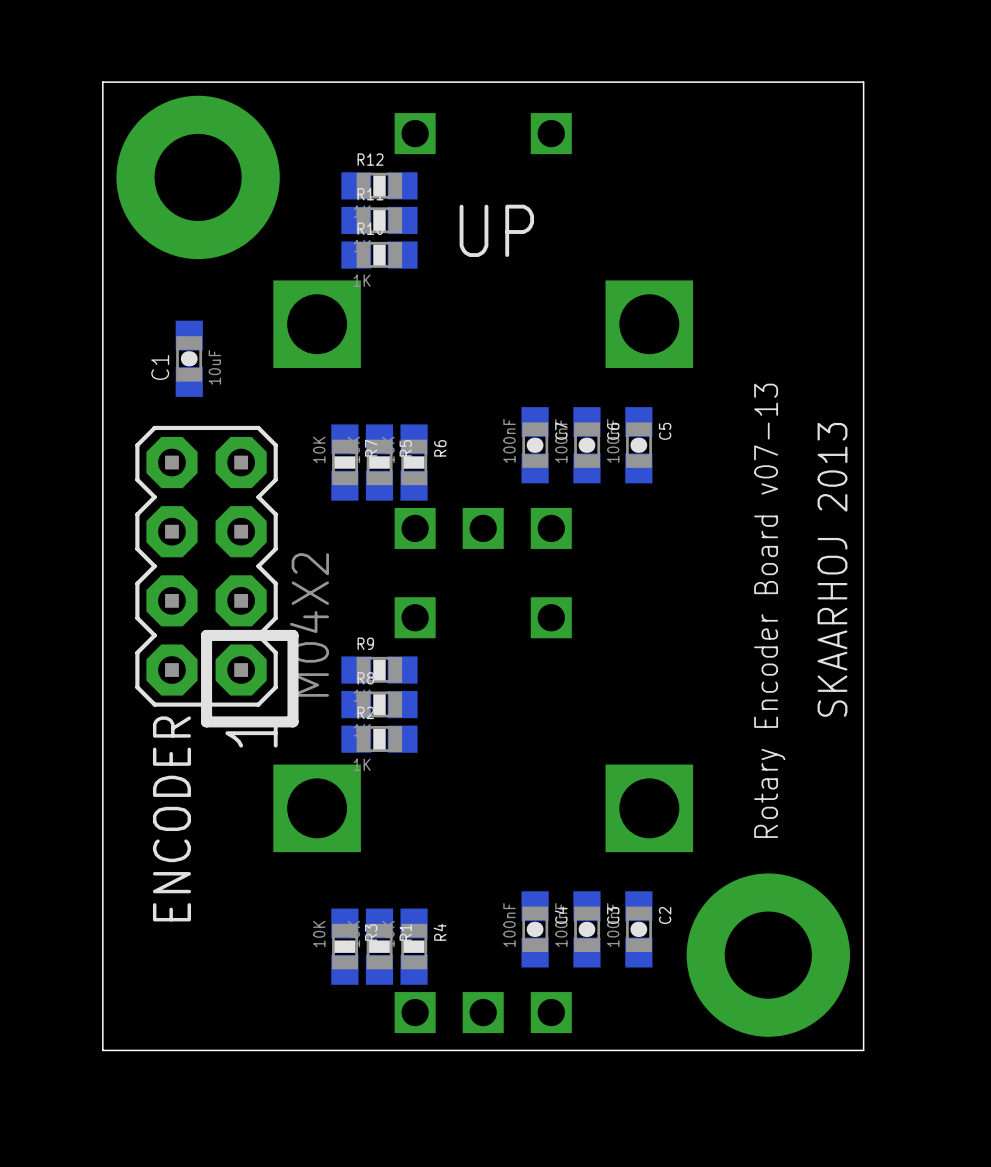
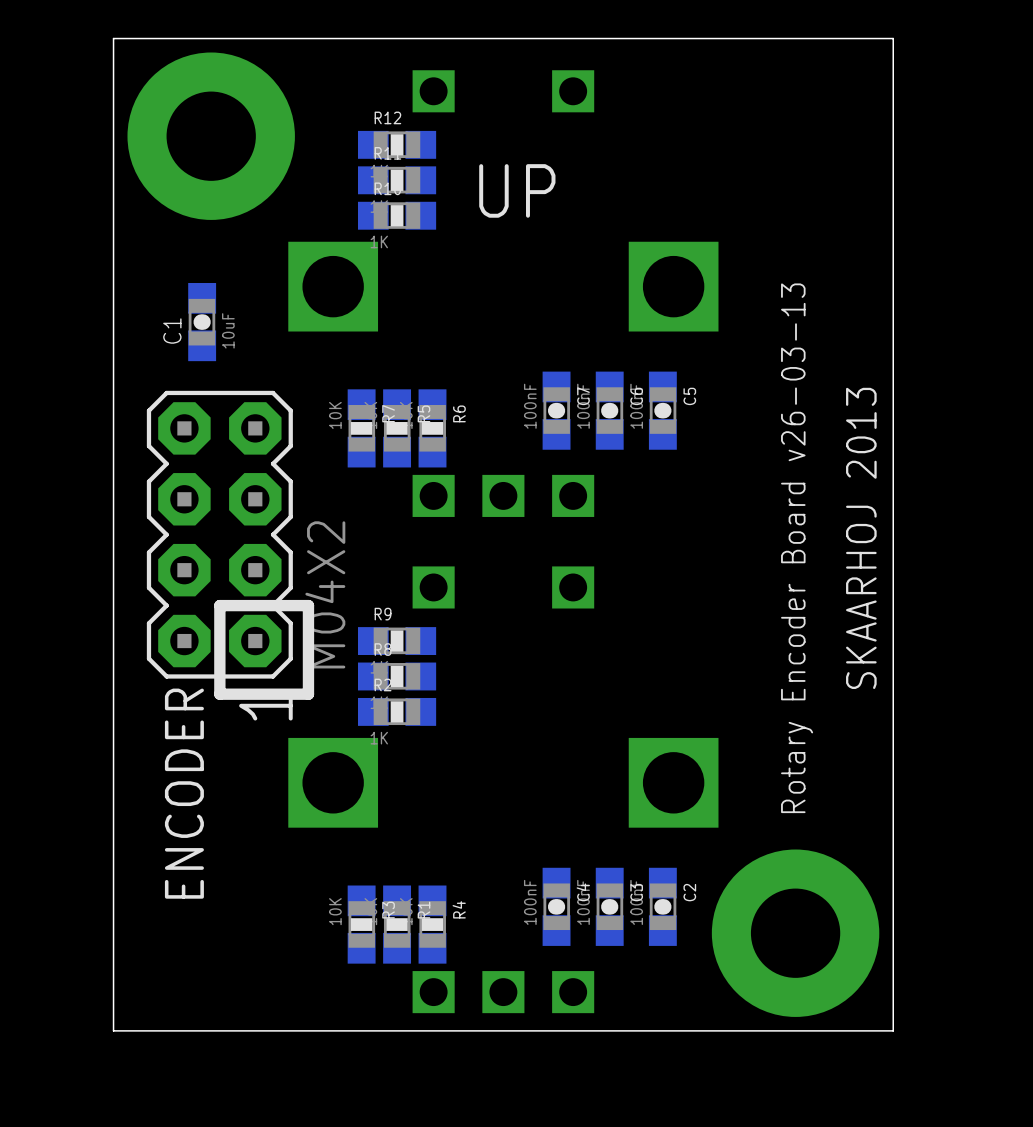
text: Rotary Encoder Board v07-13 (769, 610) -> Rotary Encoder Board v26-03-13 (797, 548)

